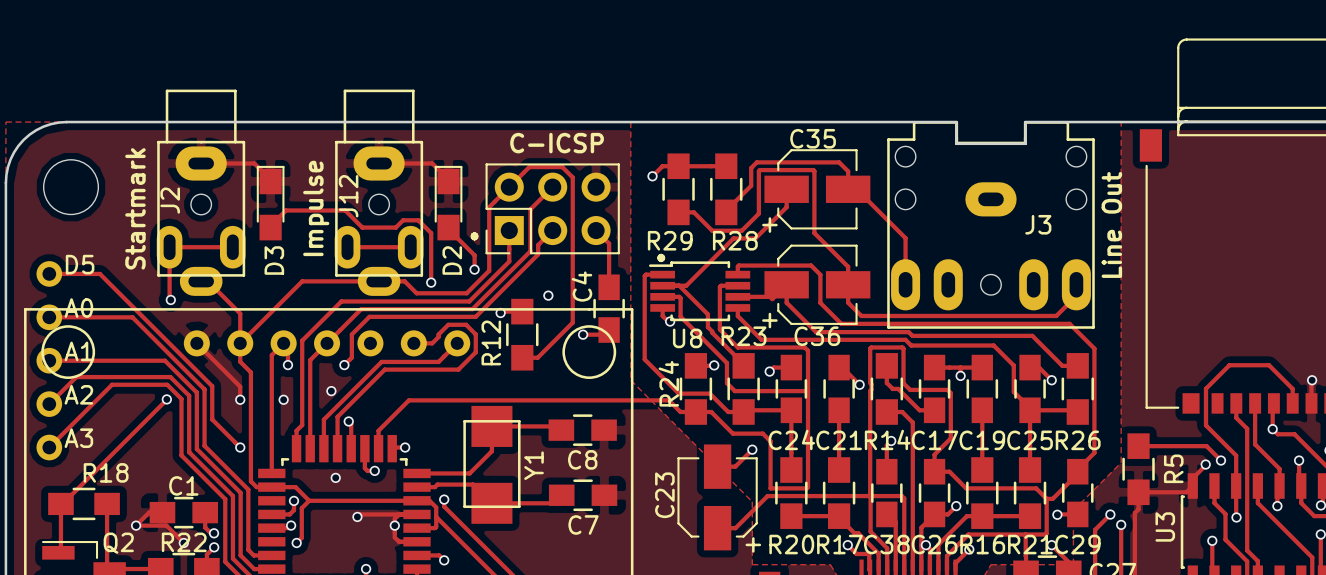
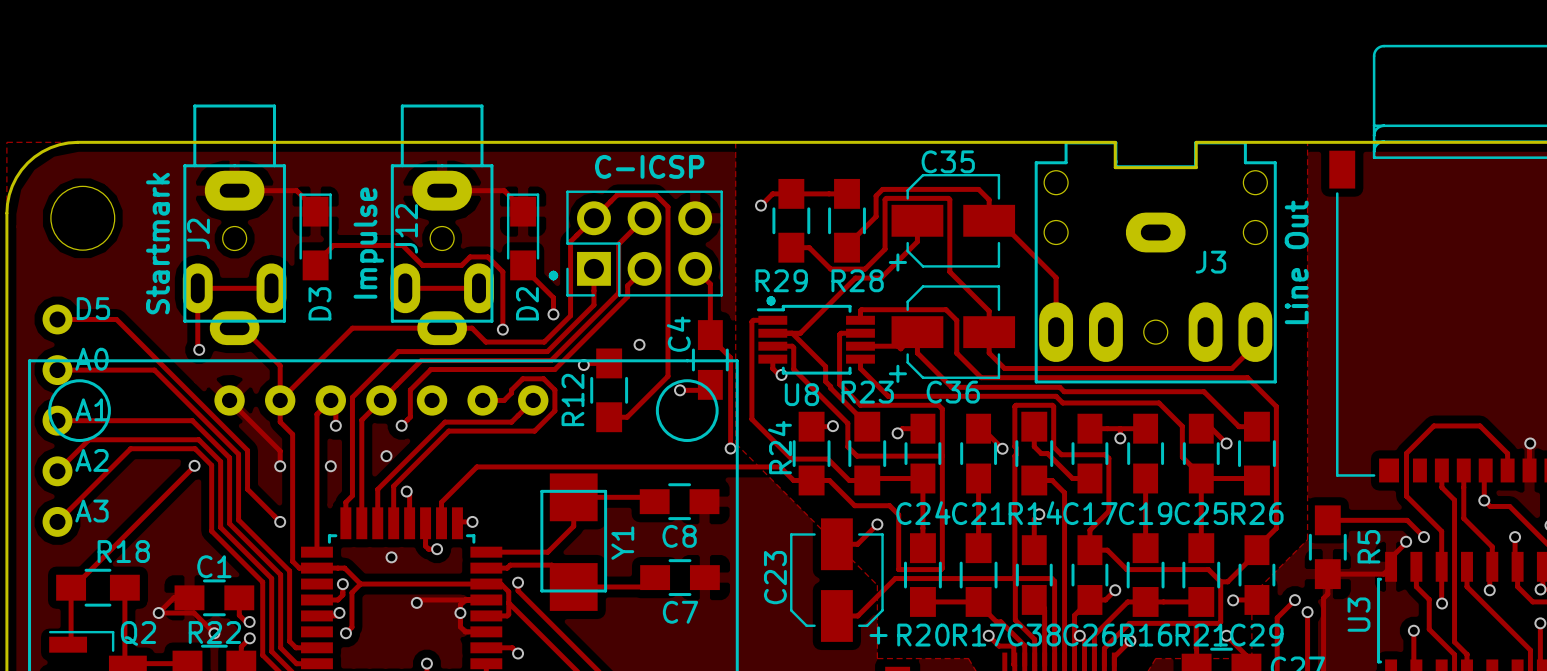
track: none -> (710, 335) (710, 337) (730, 357) (730, 448)
via: none -> (730, 448)

